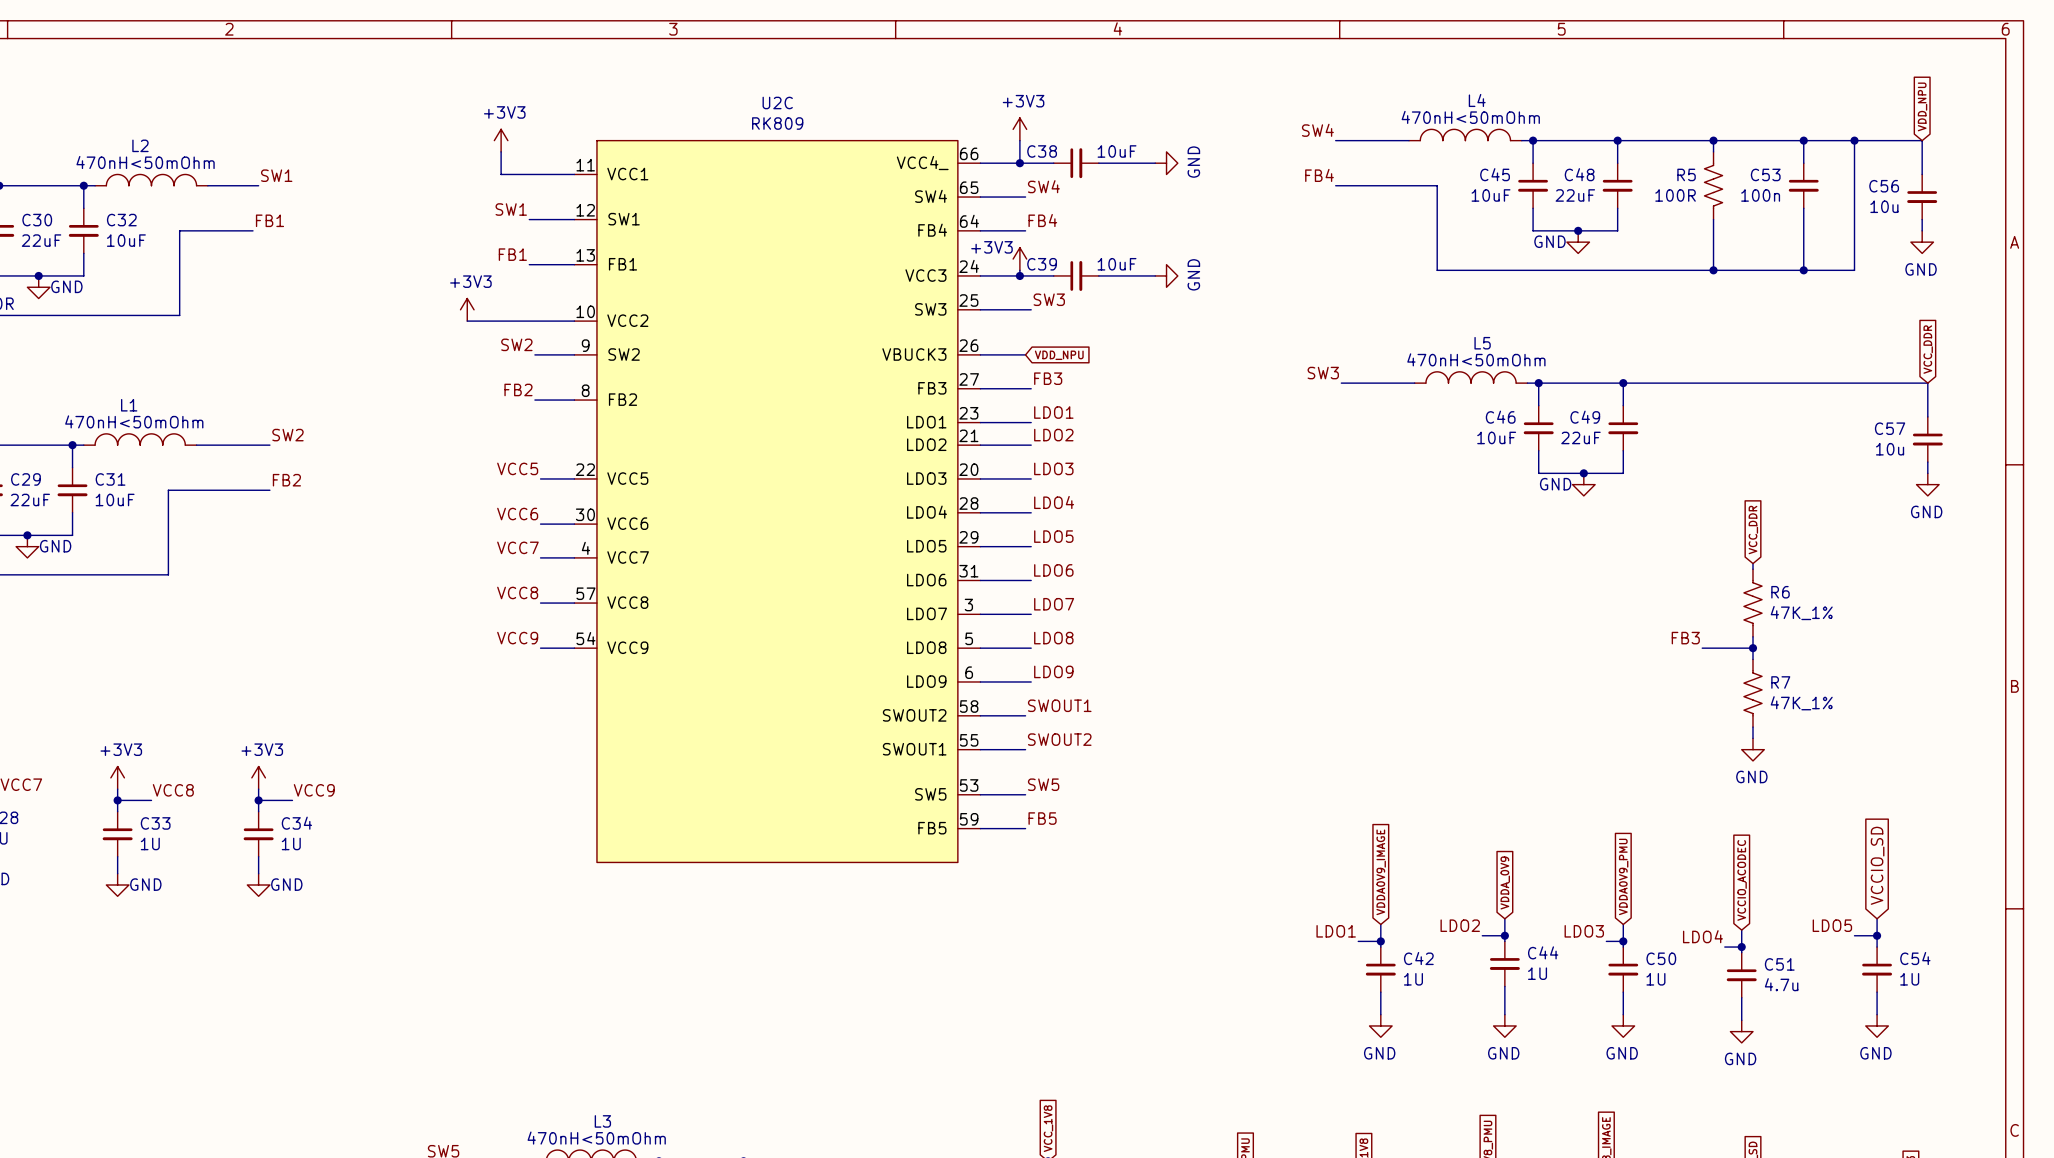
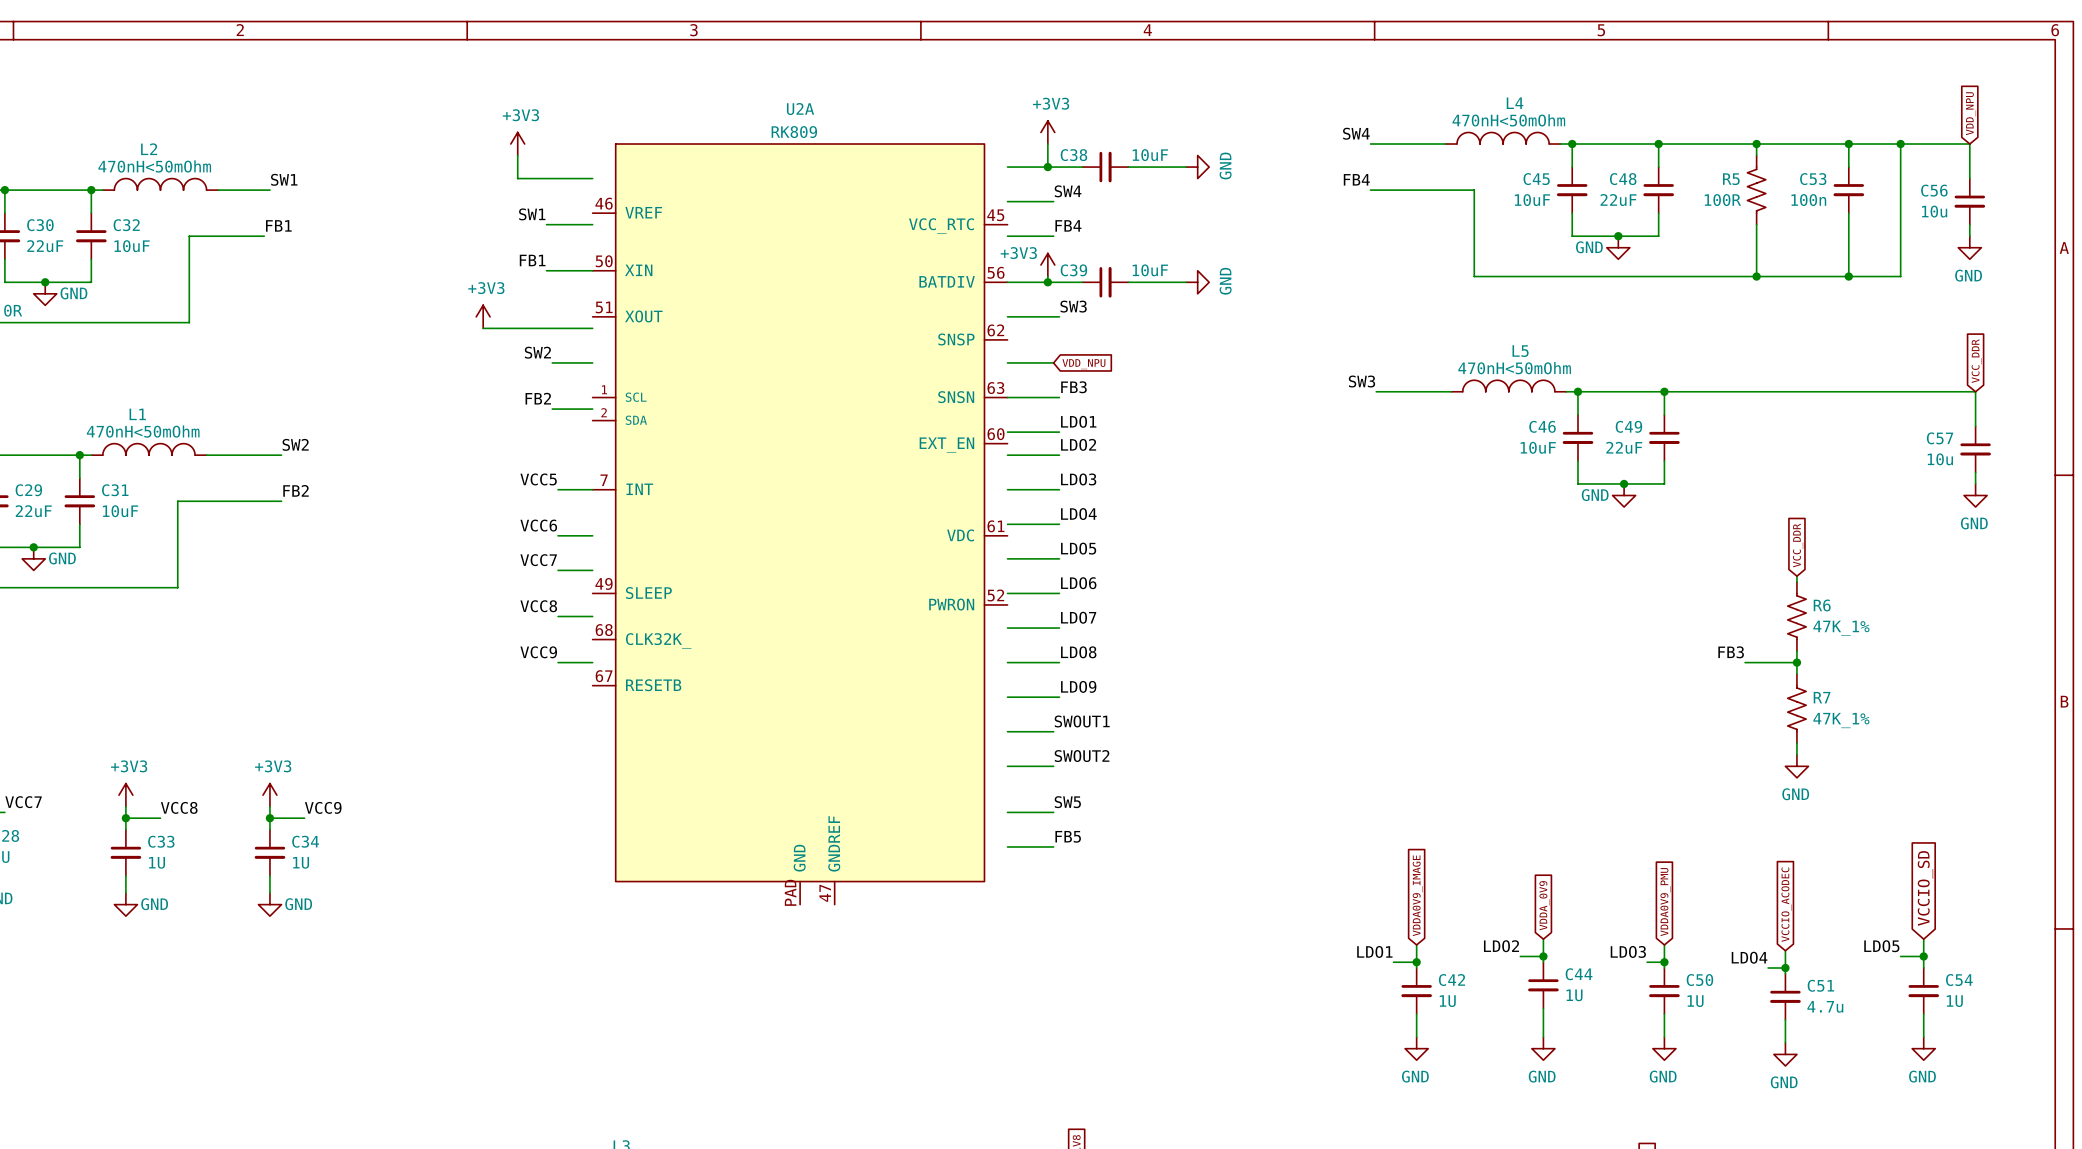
U2C: RK809 (777, 501) -> none
U2A: none -> RK809 (800, 524)

